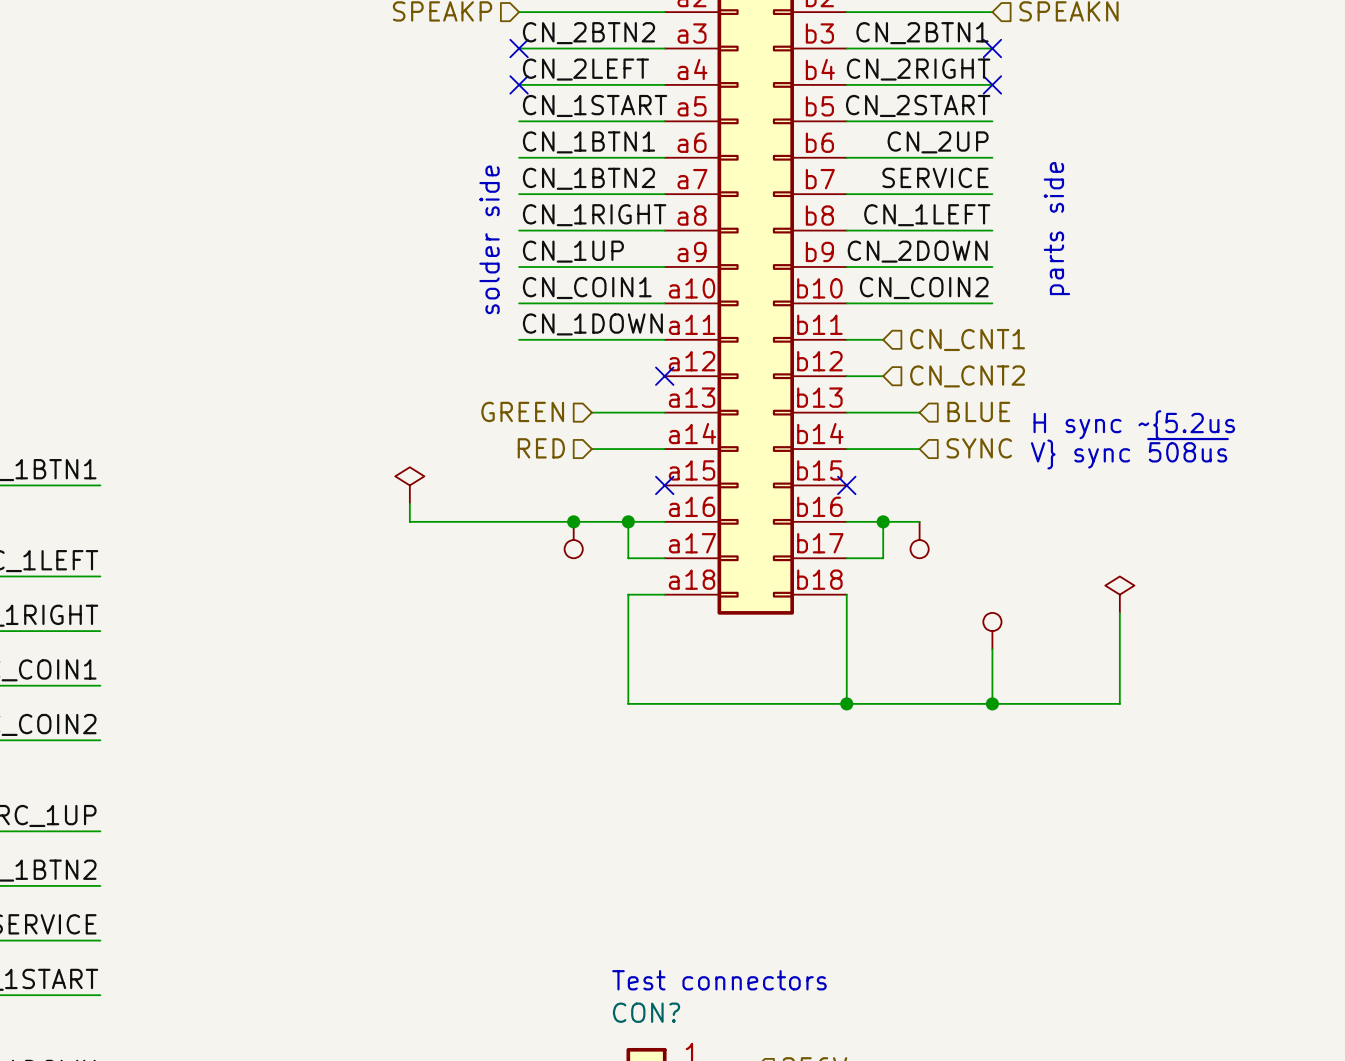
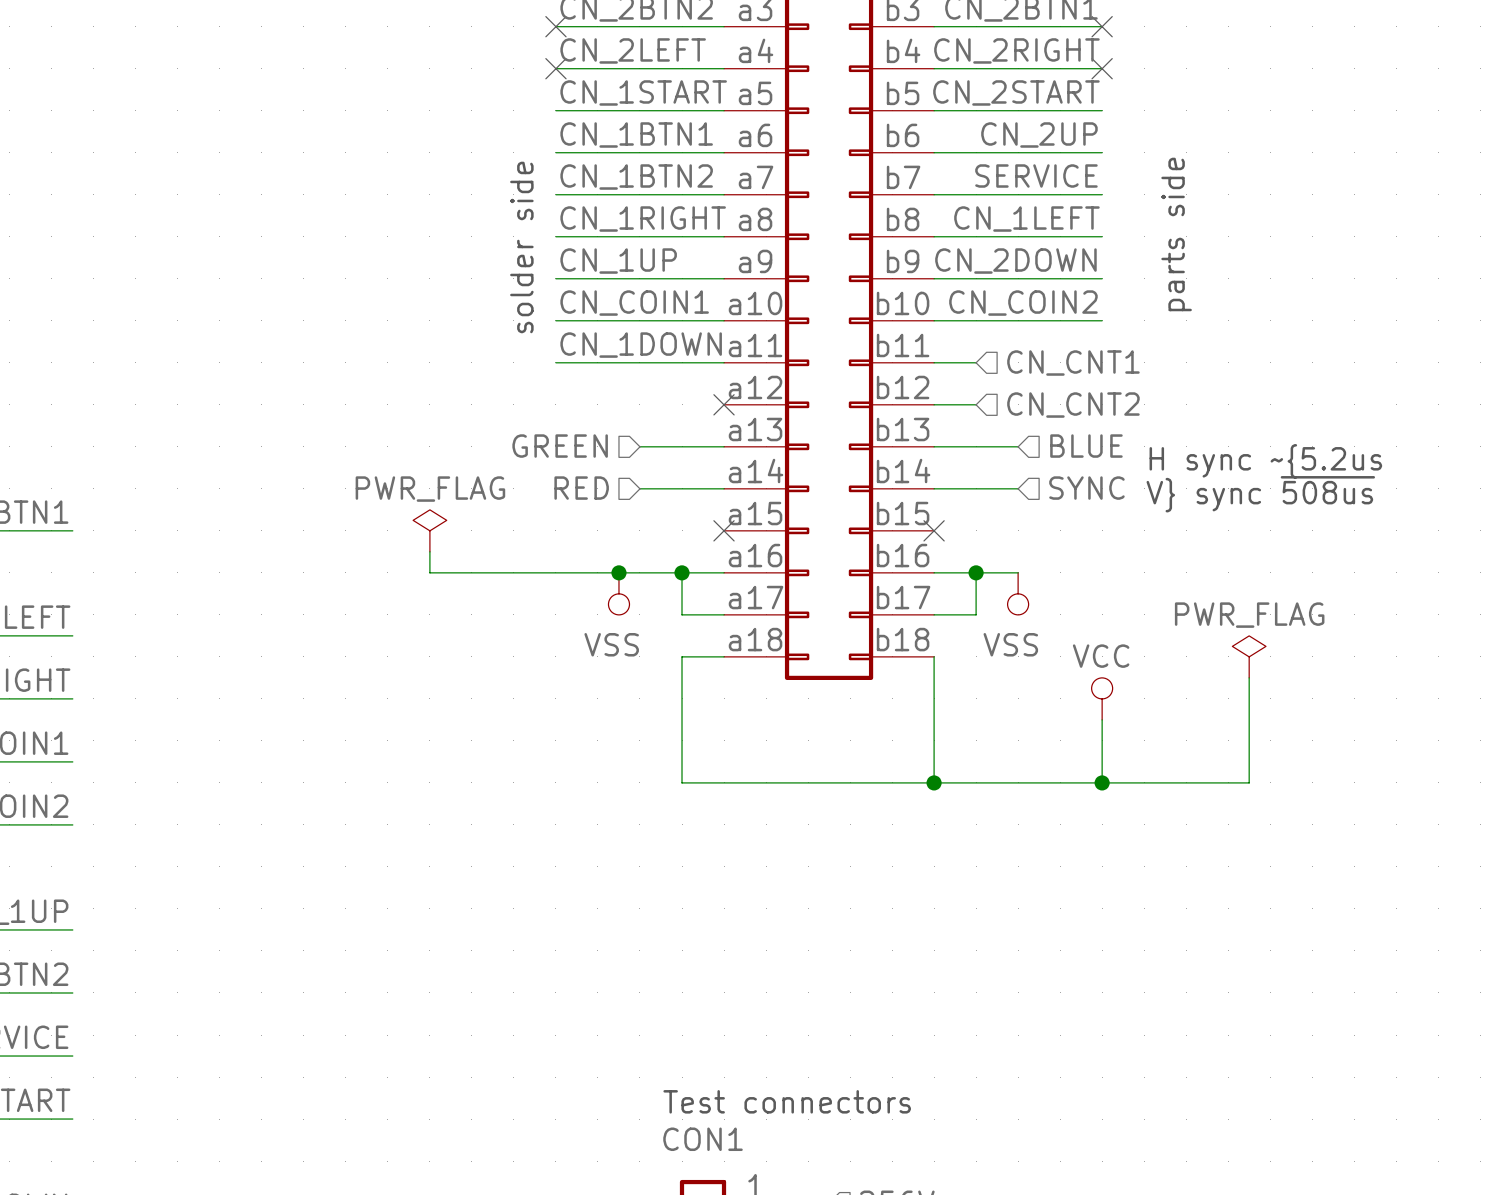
power symbol text: none -> PWR_FLAG (430, 489)
power symbol text: none -> PWR_FLAG (1249, 615)
power symbol text: none -> VSS (611, 644)
power symbol text: none -> VSS (1010, 644)
power symbol text: none -> VCC (1101, 656)
CON? name: CON? (646, 1012) -> CON1 (703, 1139)

